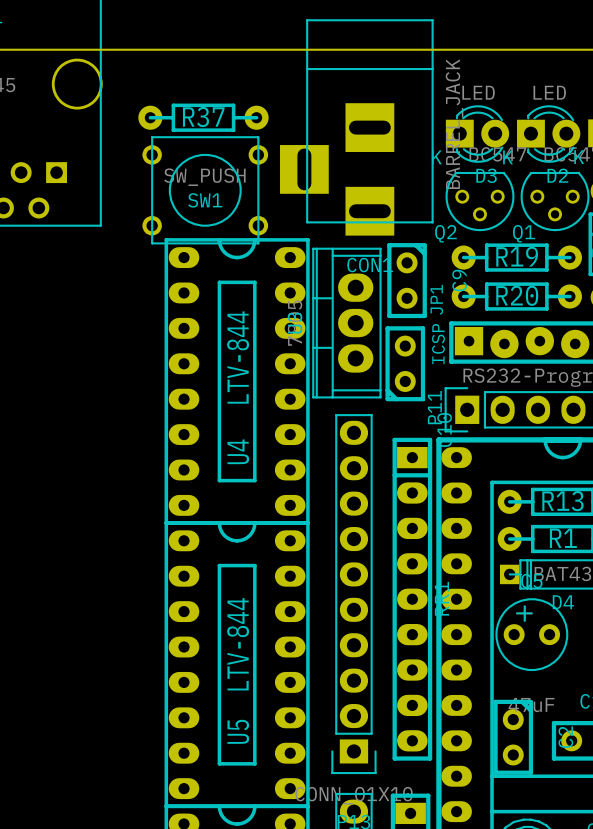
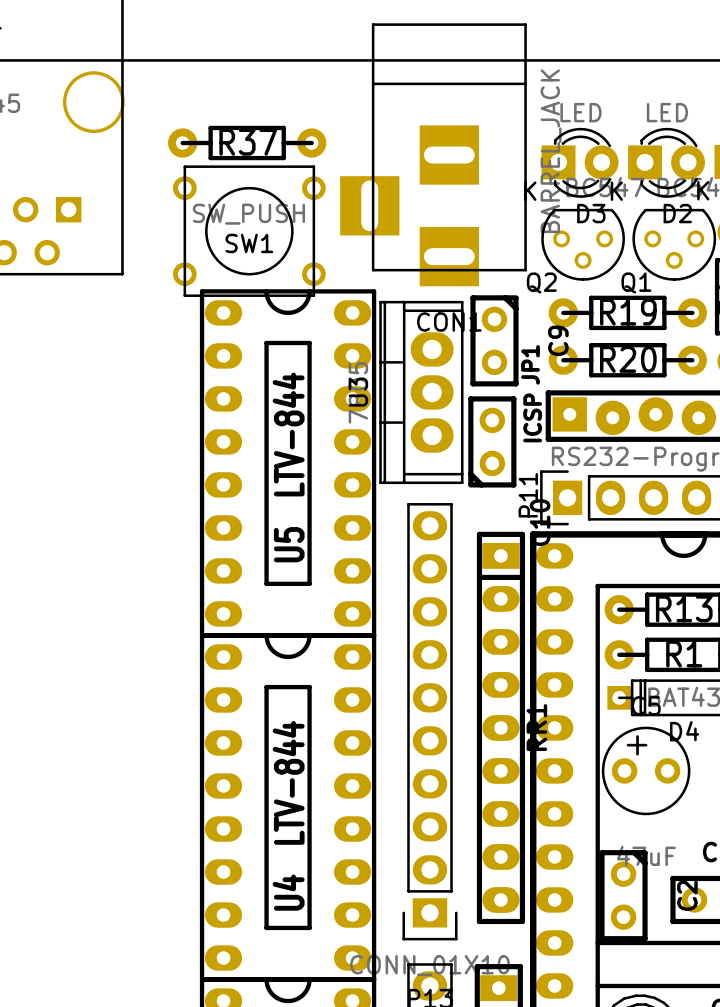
U4 name: U4 (238, 451) -> U5 (289, 544)
U5 name: U5 (238, 731) -> U4 (288, 892)

